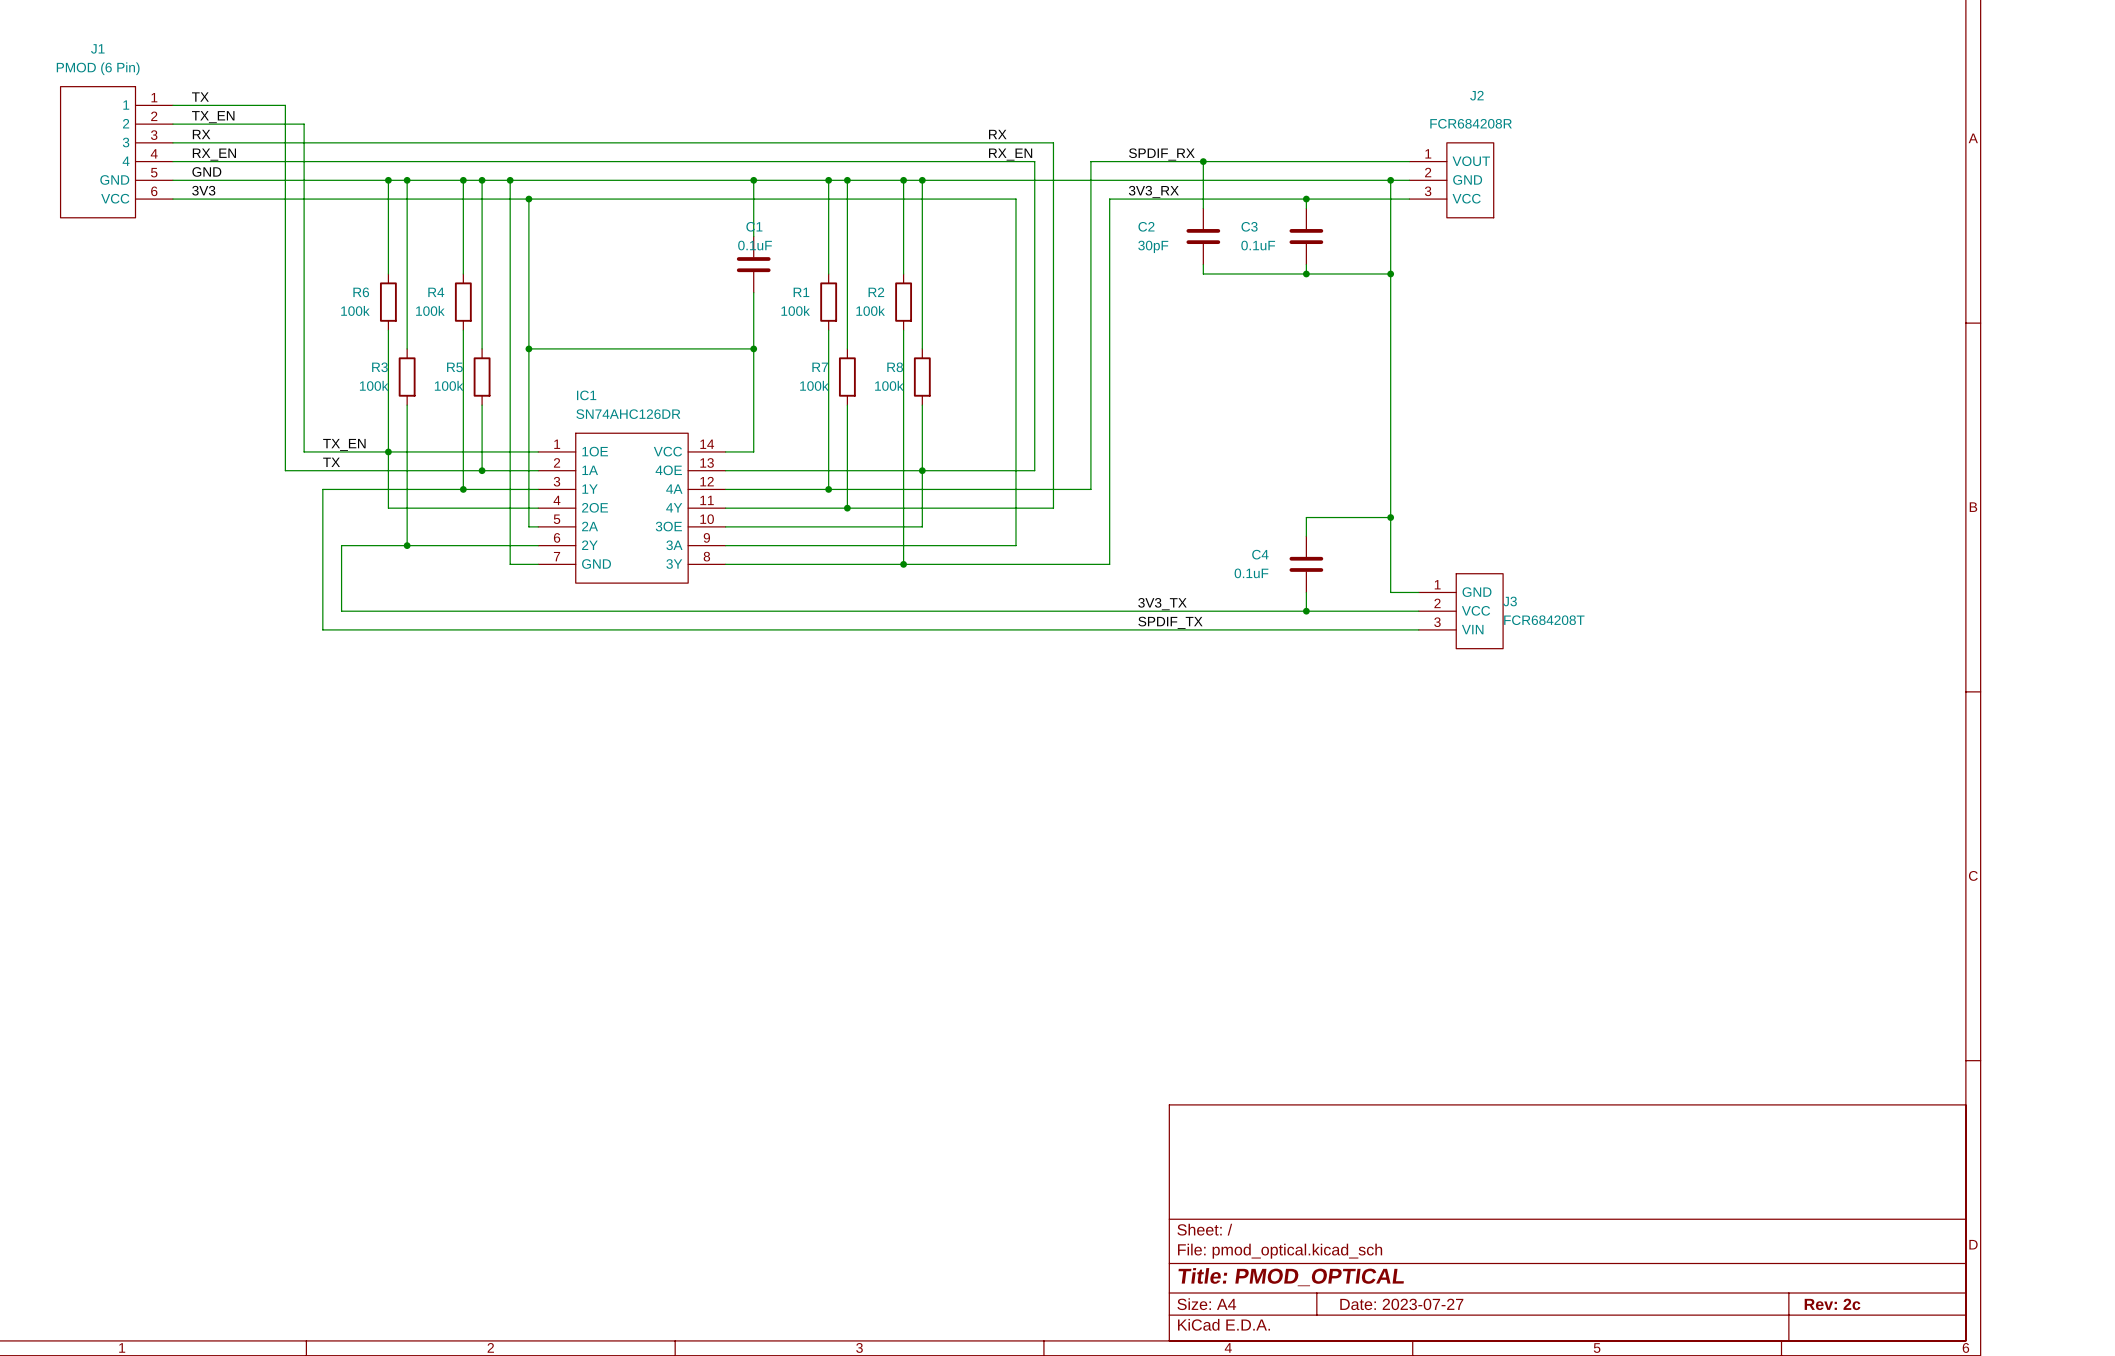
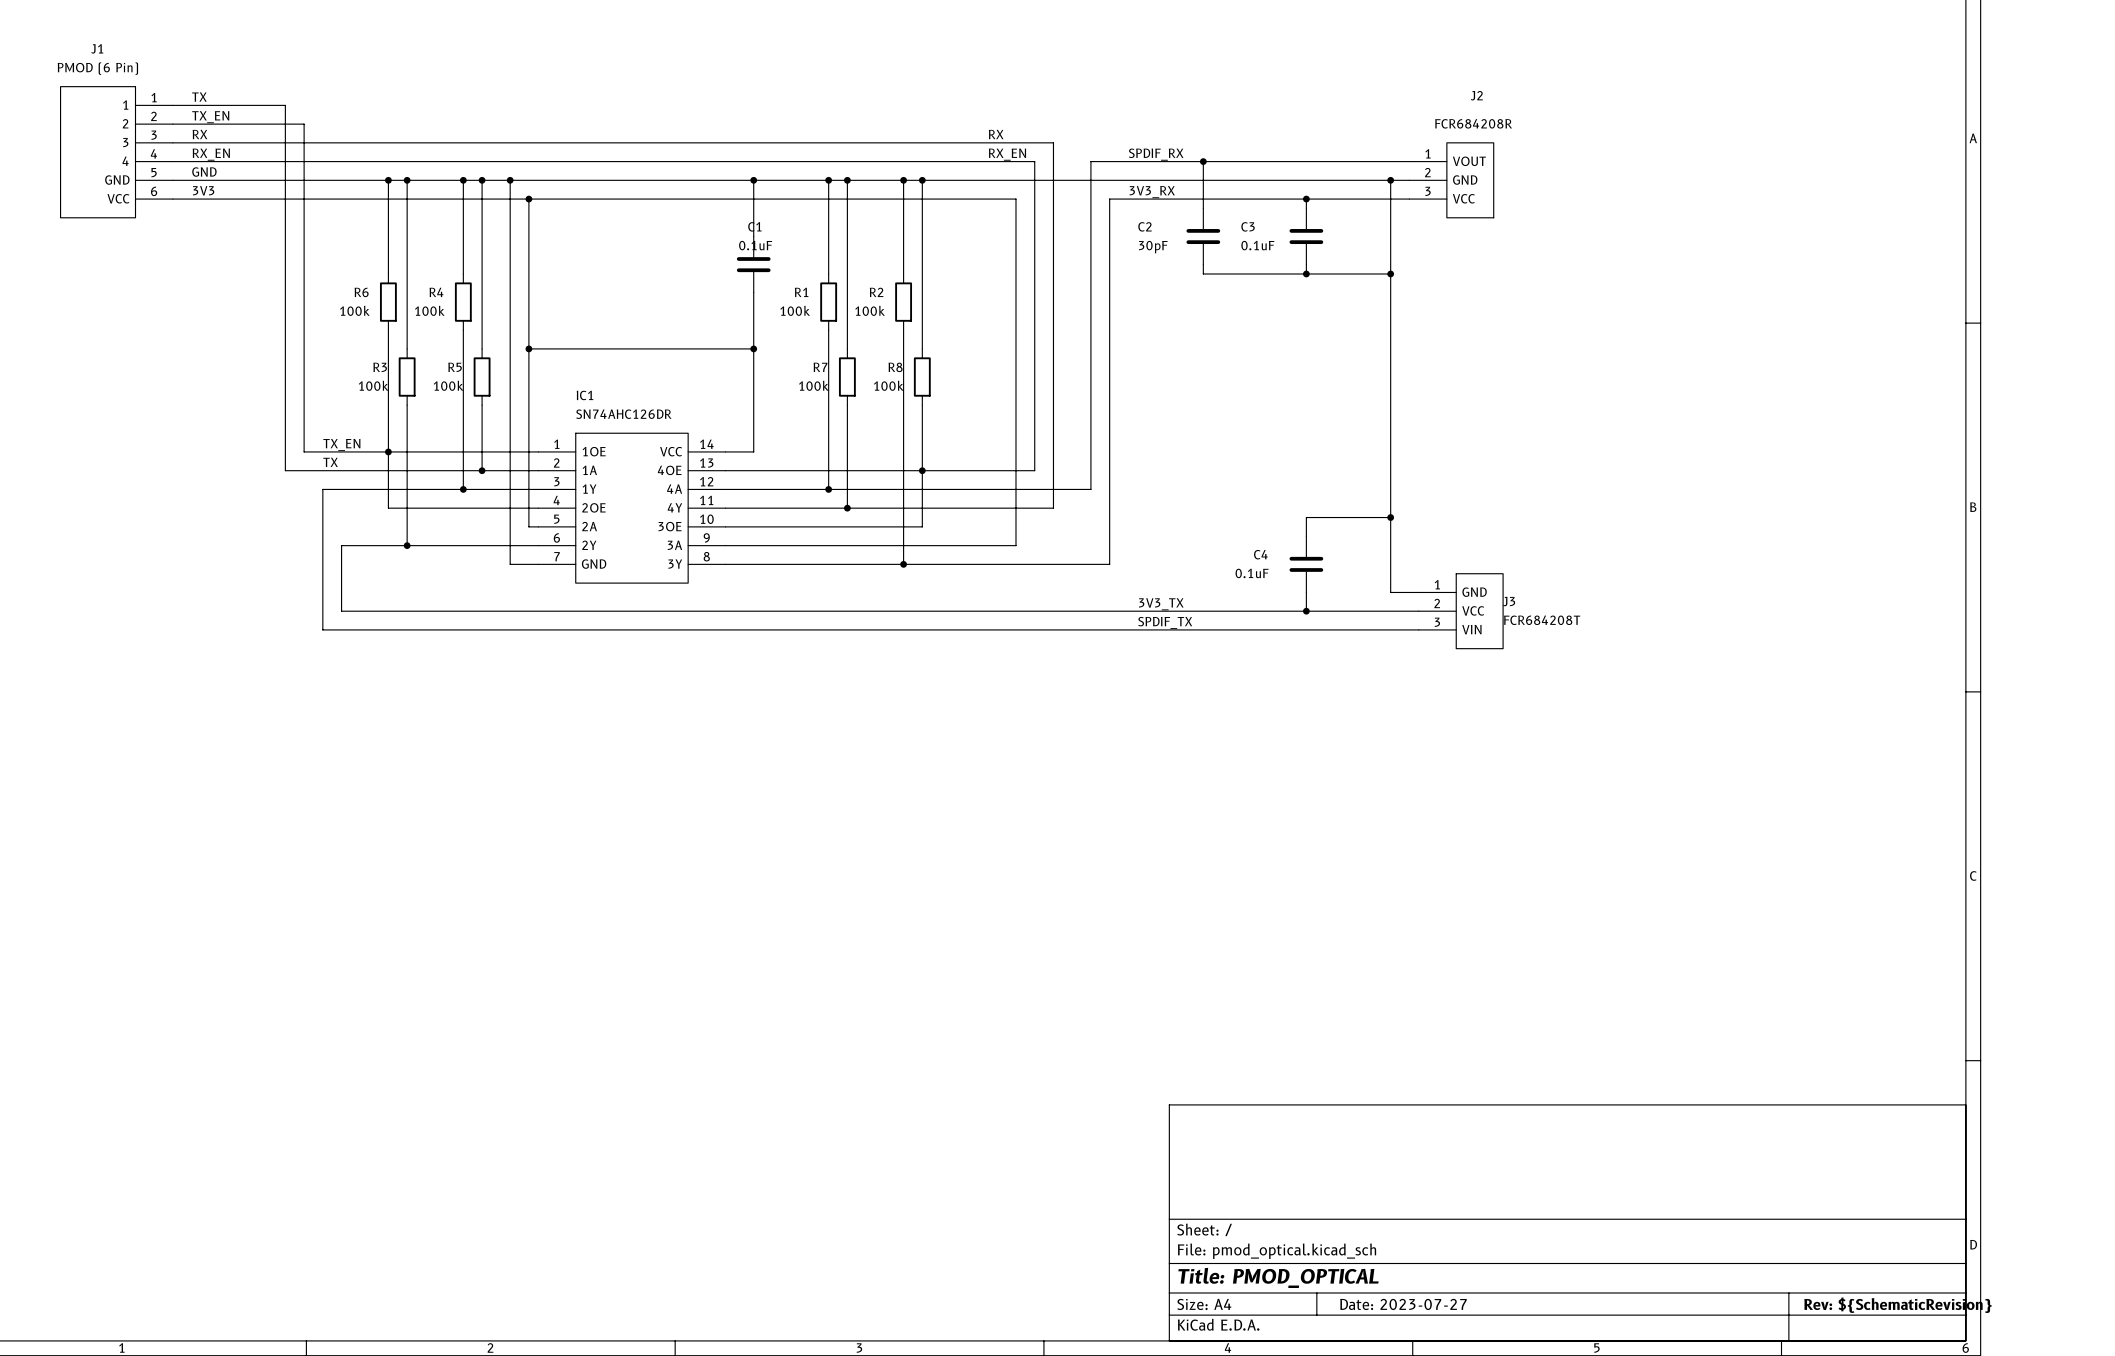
title block: Rev: 2c (1832, 1304) -> Rev: ${SchematicRevision} (1897, 1305)

